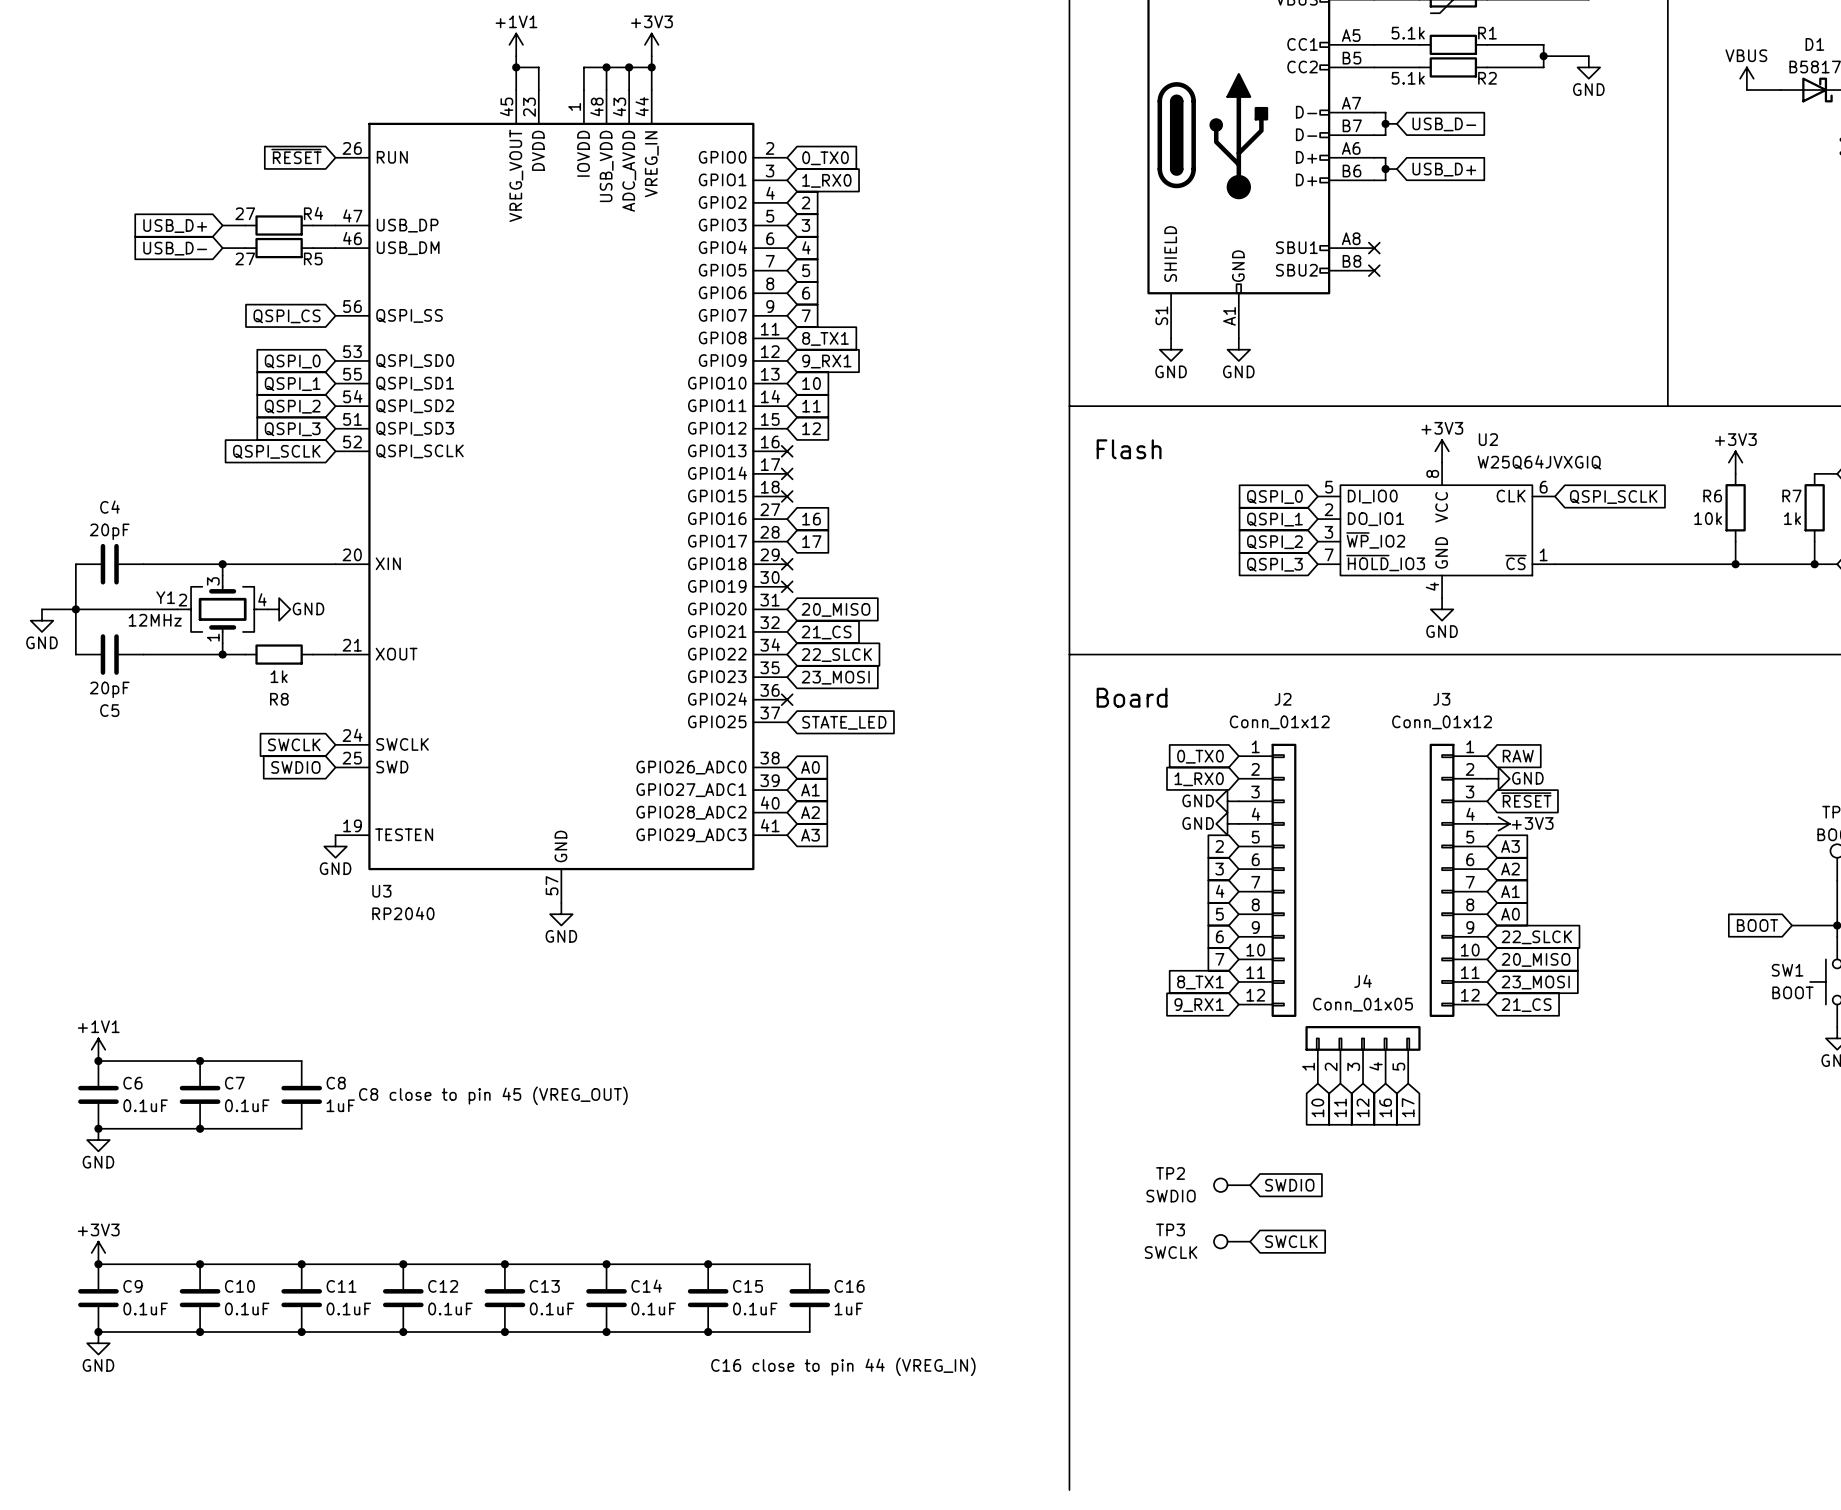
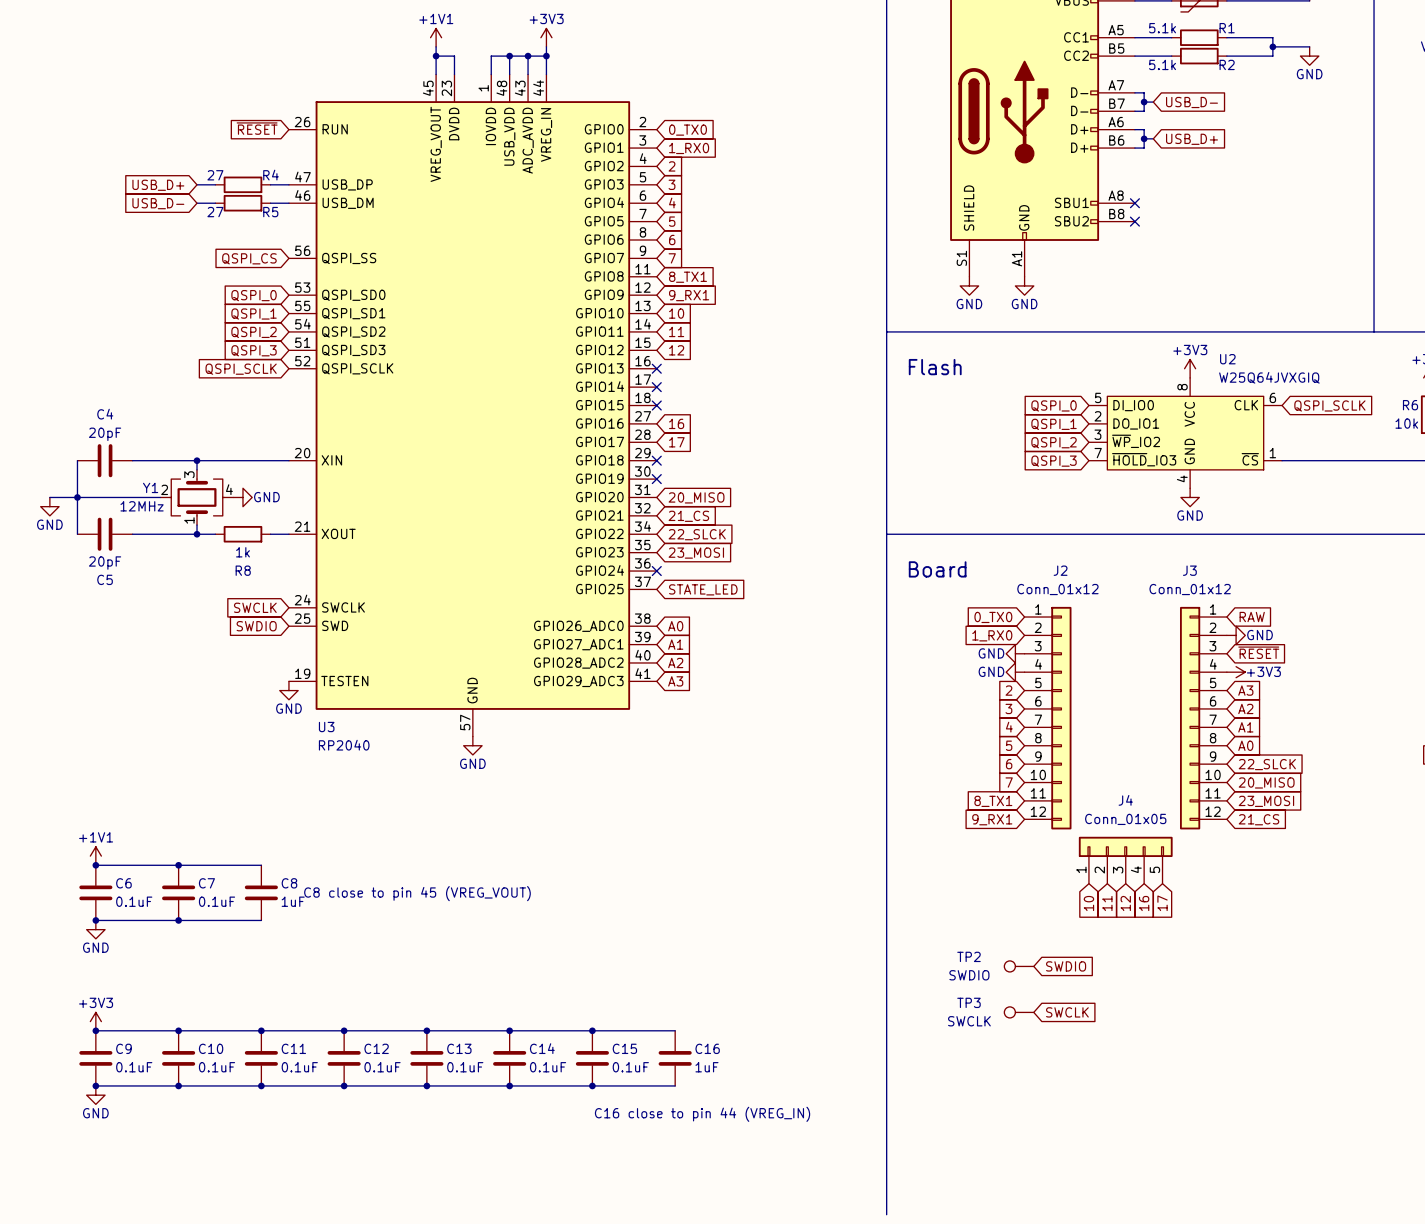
C8 text: C8 close to pin 45 (VREG_OUT) (493, 1095) -> C8 close to pin 45 (VREG_VOUT) (417, 893)

